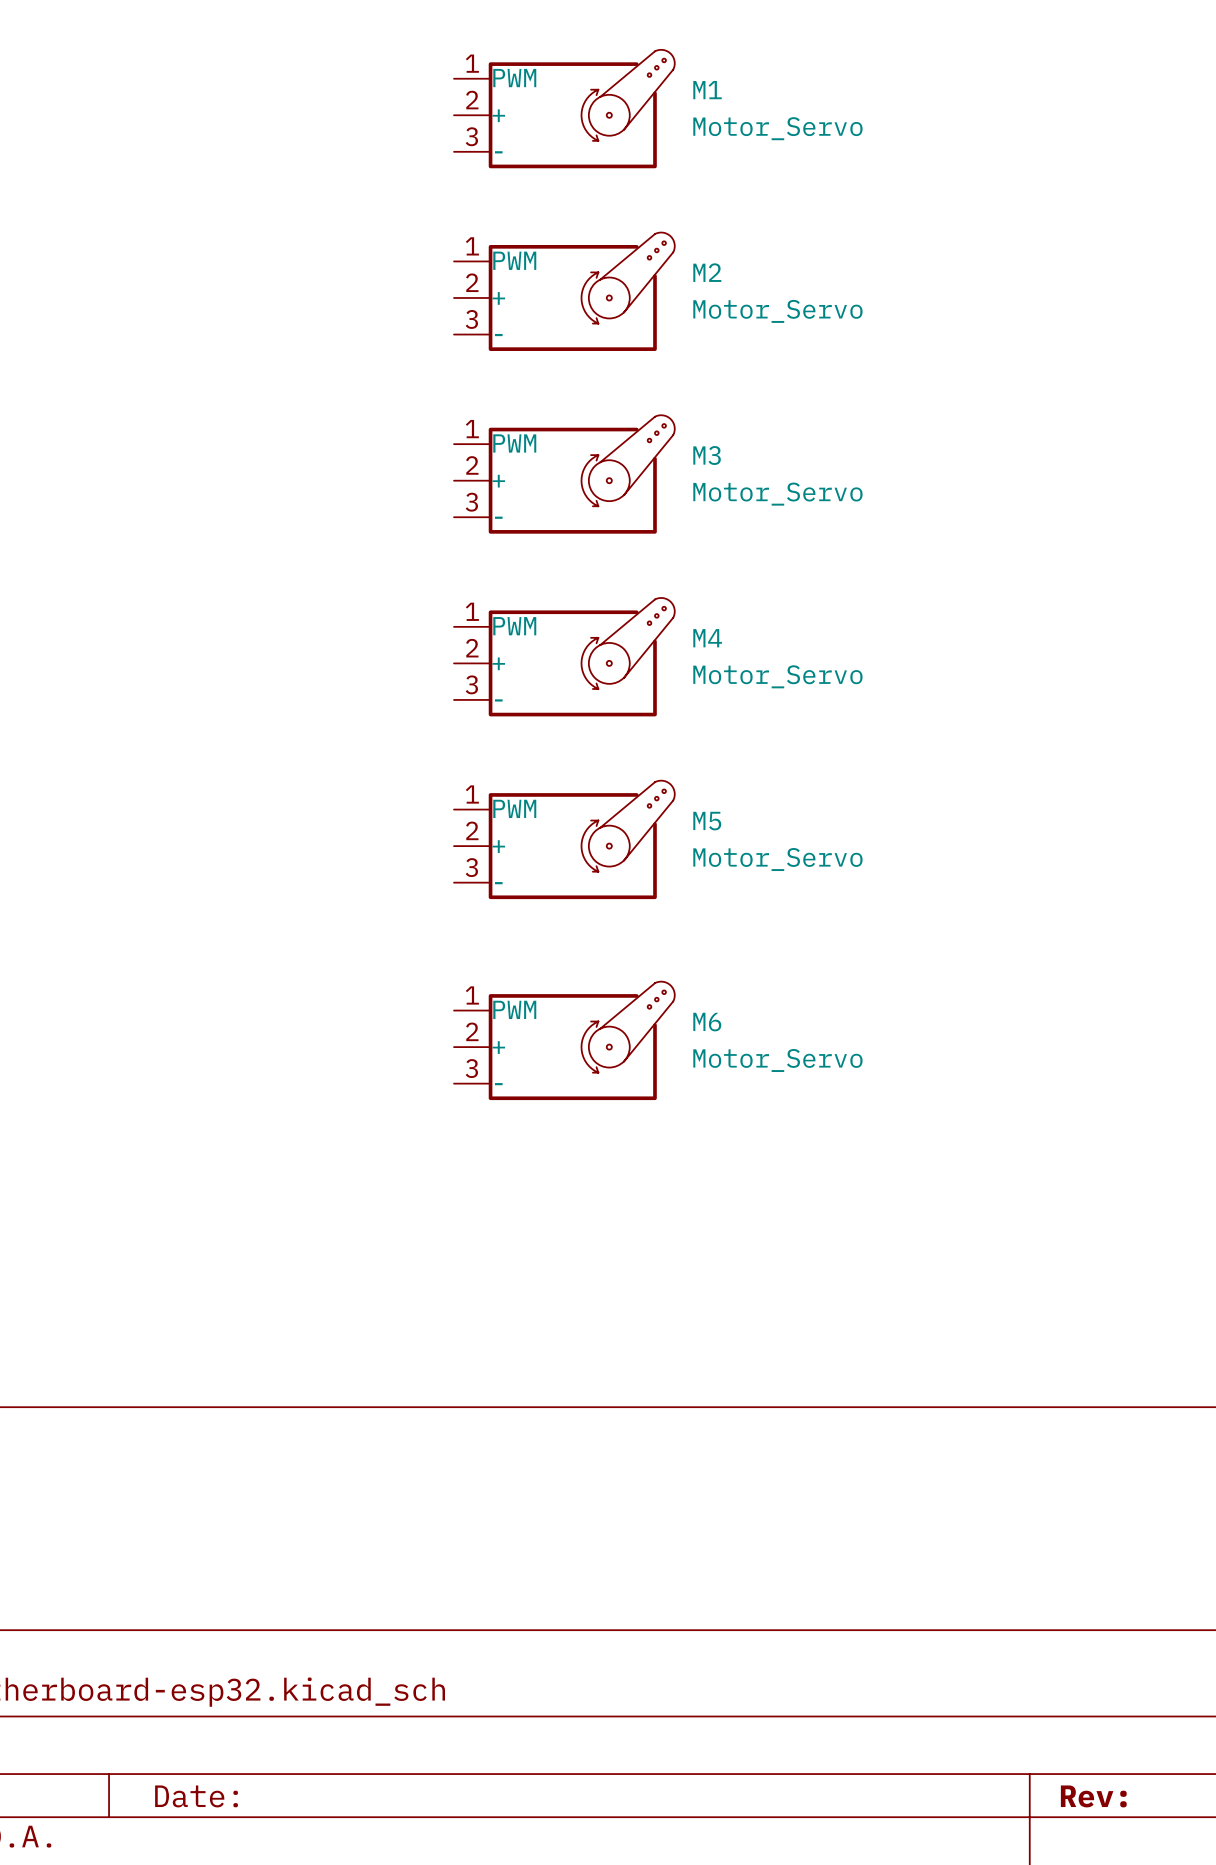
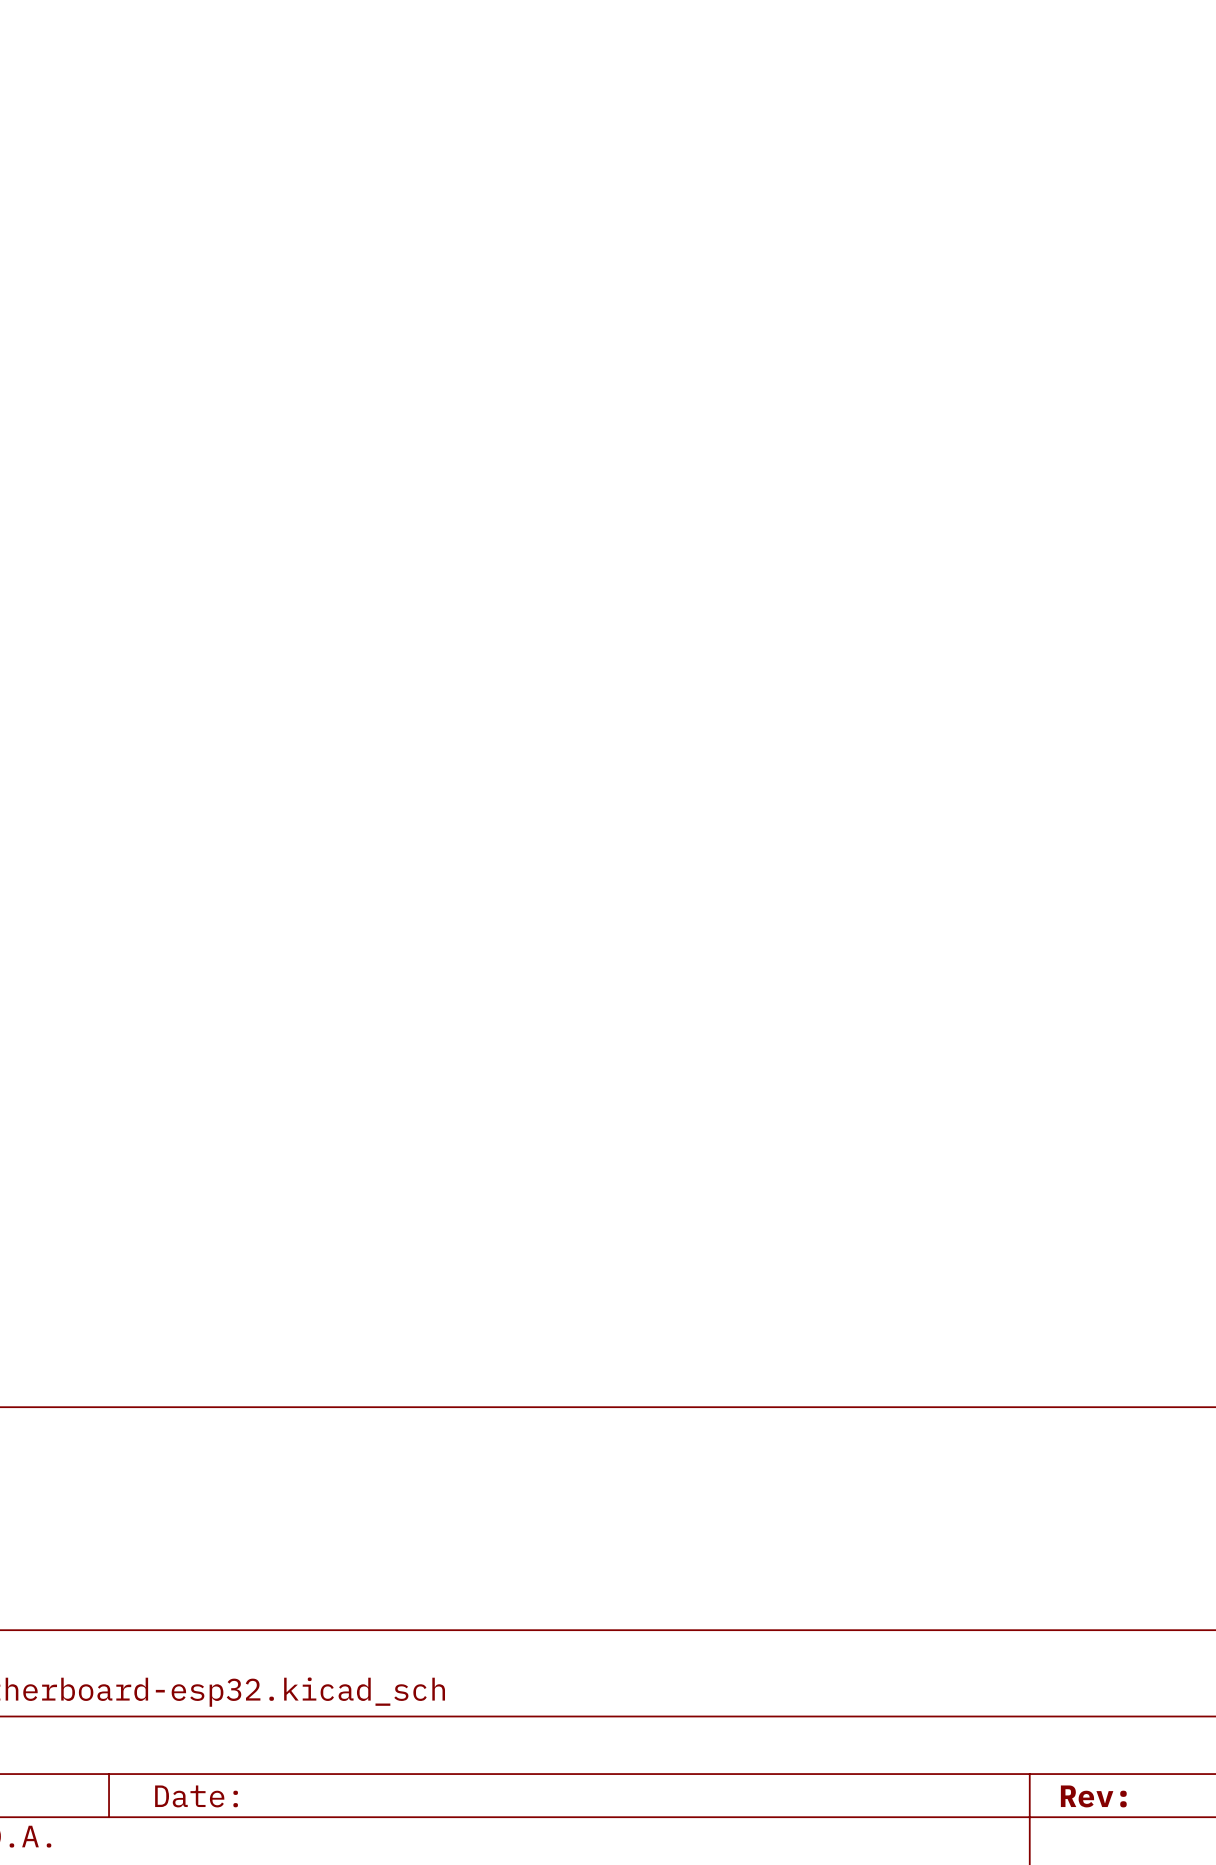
M1: Motor_Servo (564, 109) -> none
M2: Motor_Servo (564, 291) -> none
M3: Motor_Servo (564, 474) -> none
M4: Motor_Servo (564, 657) -> none
M5: Motor_Servo (564, 839) -> none
M6: Motor_Servo (564, 1040) -> none

